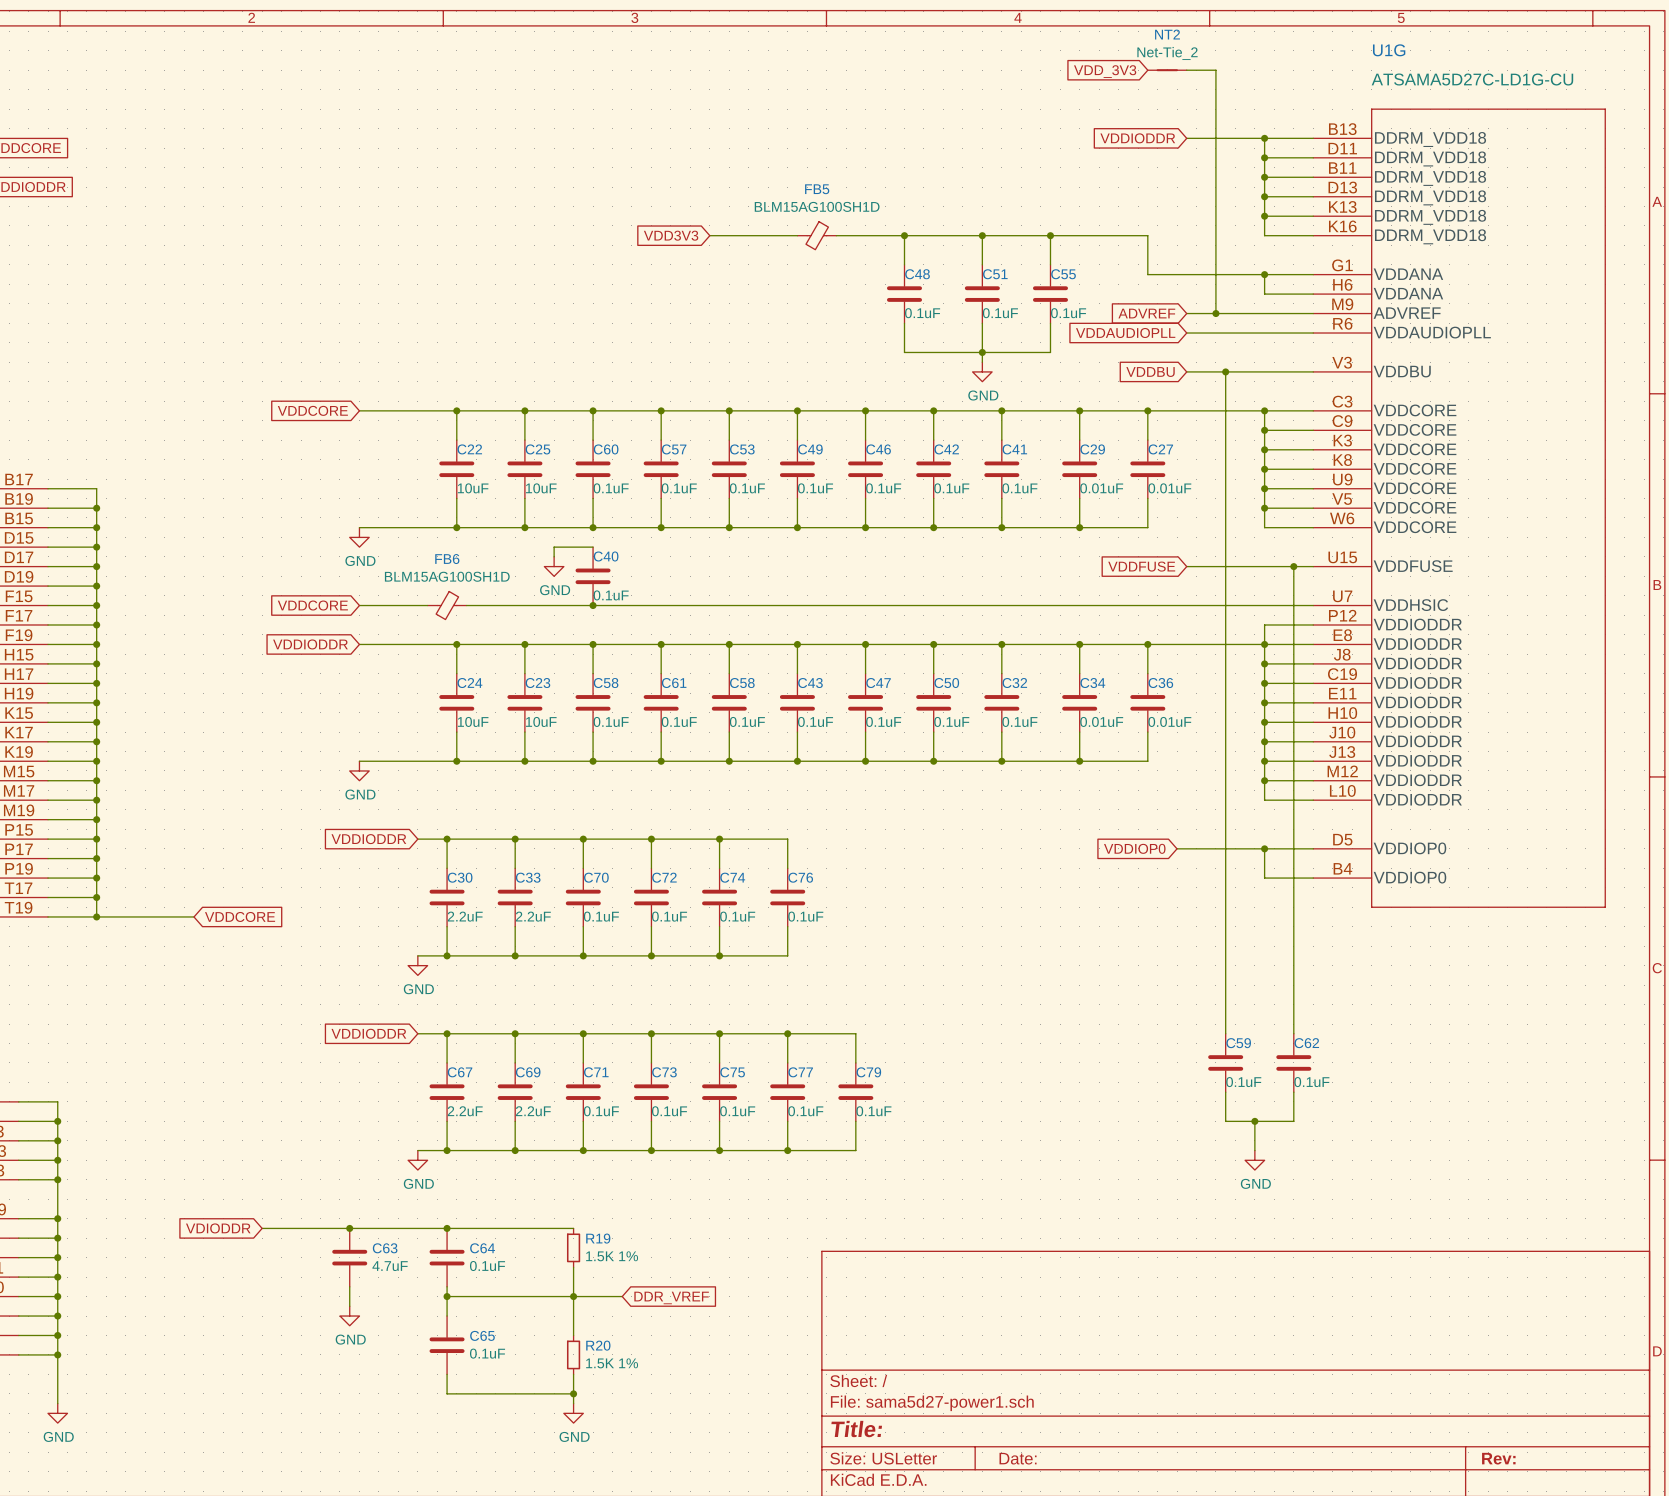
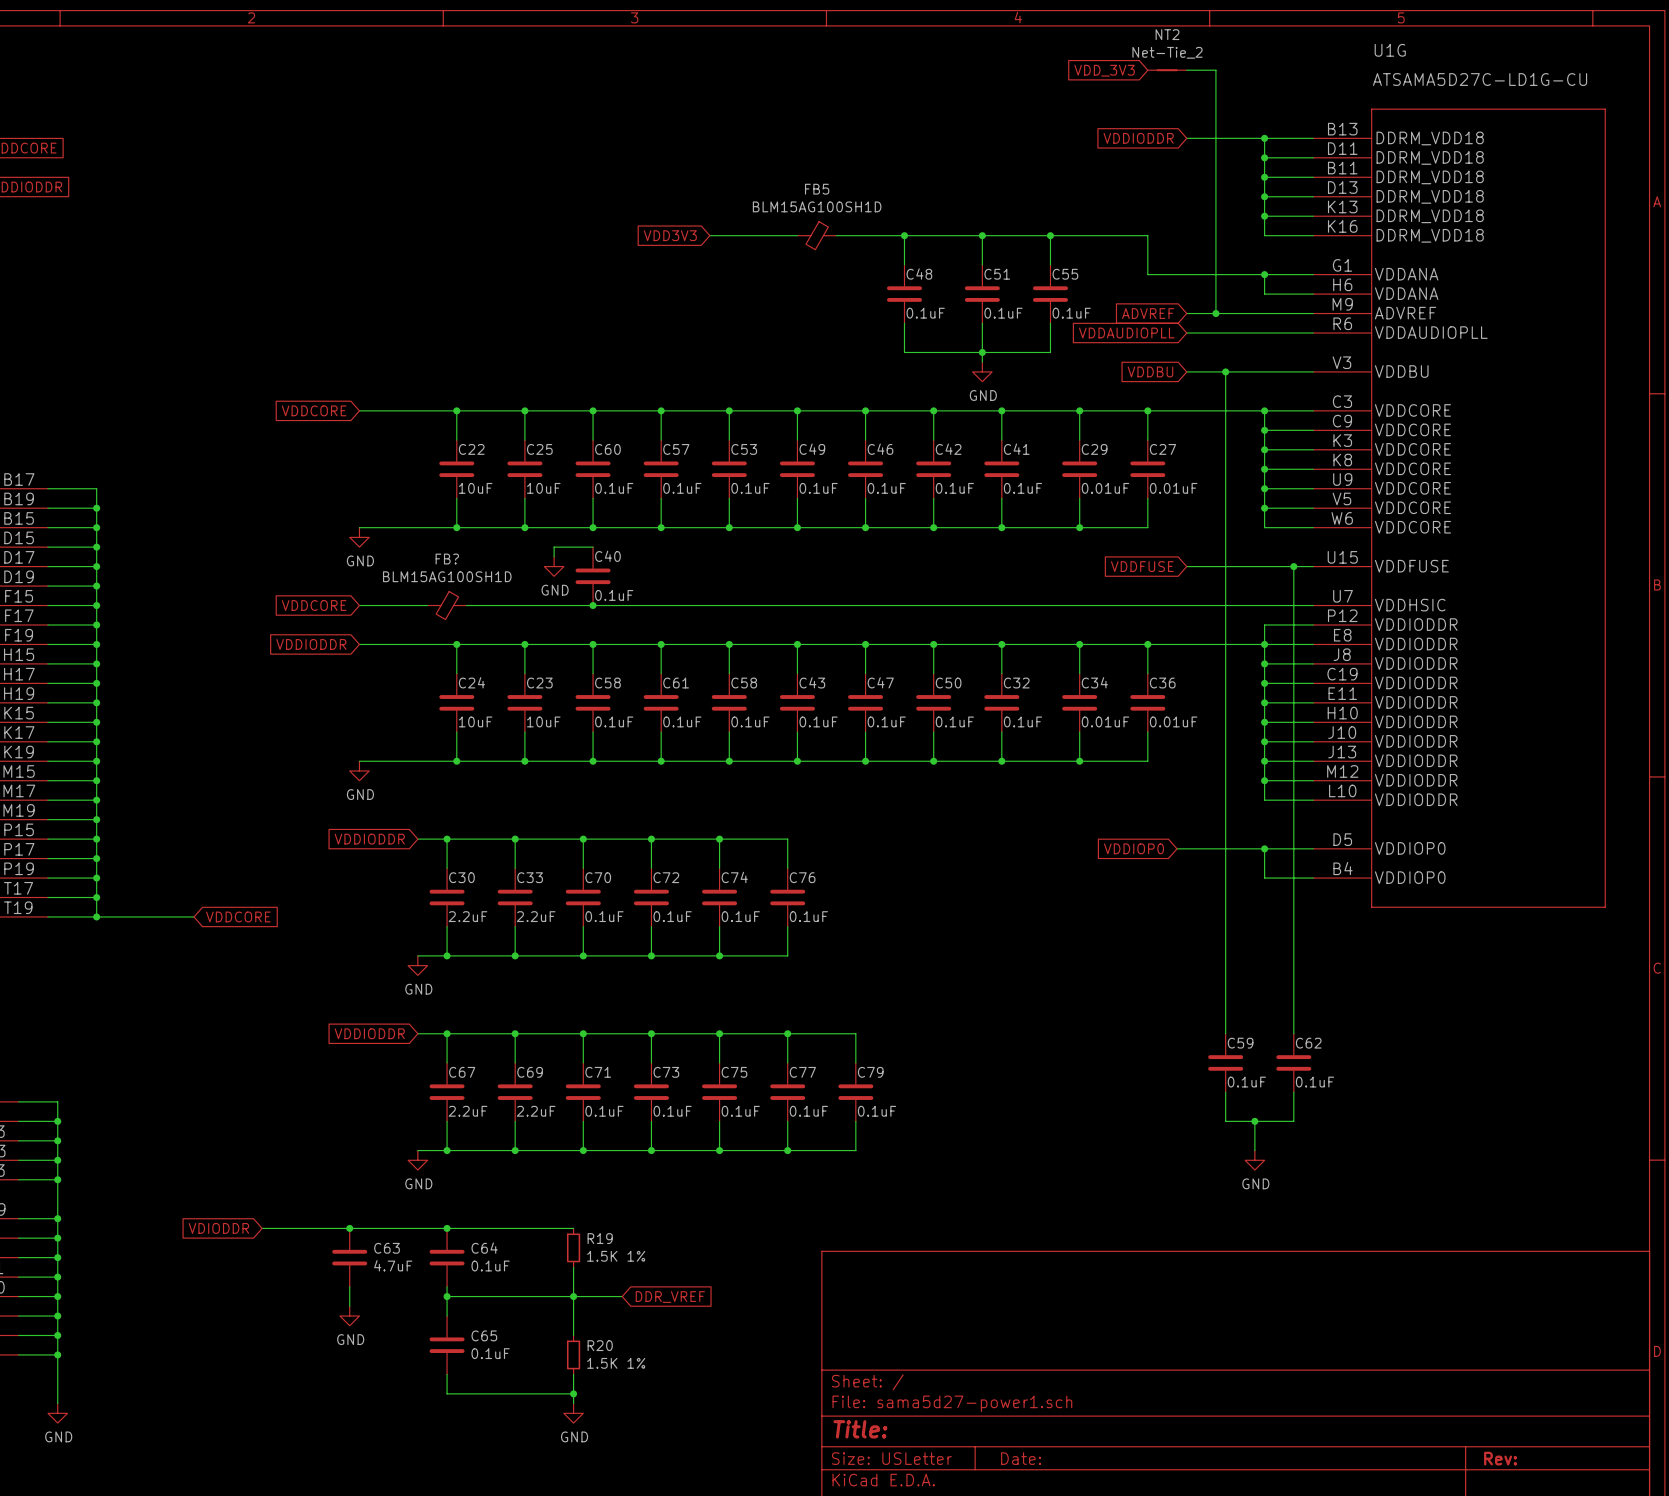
FB6 name: FB6 (447, 559) -> FB? (447, 559)

